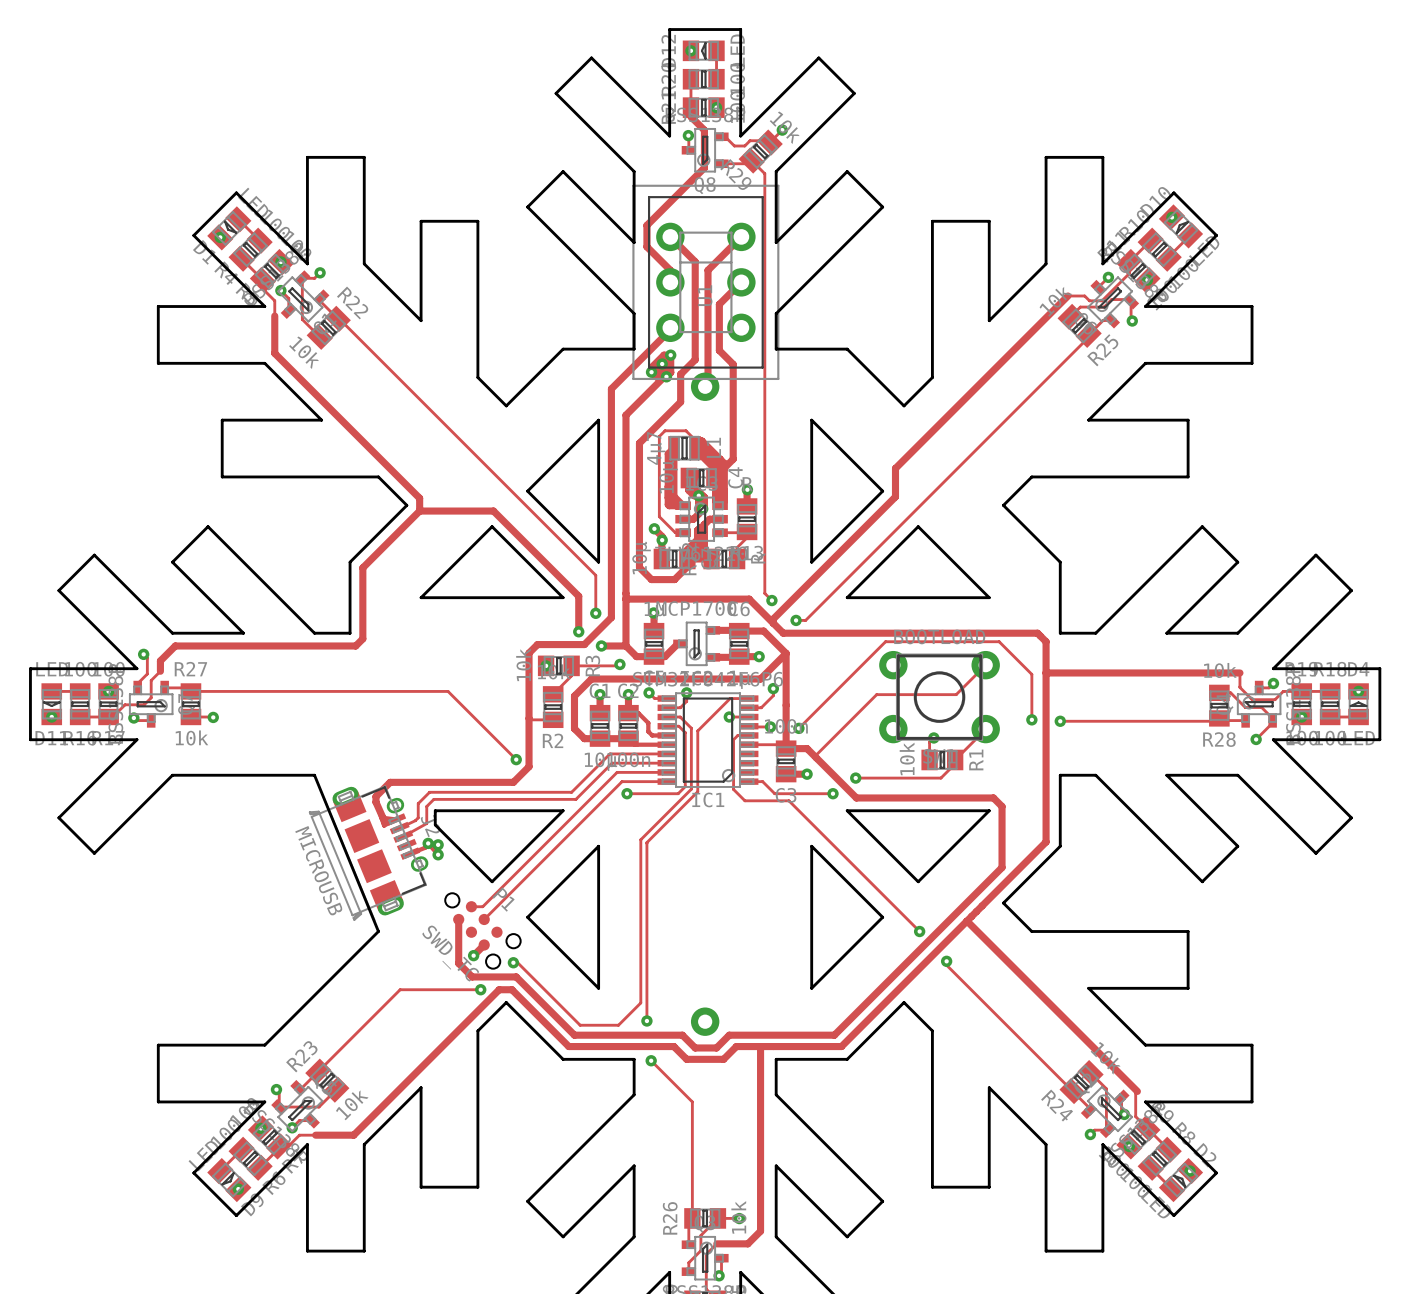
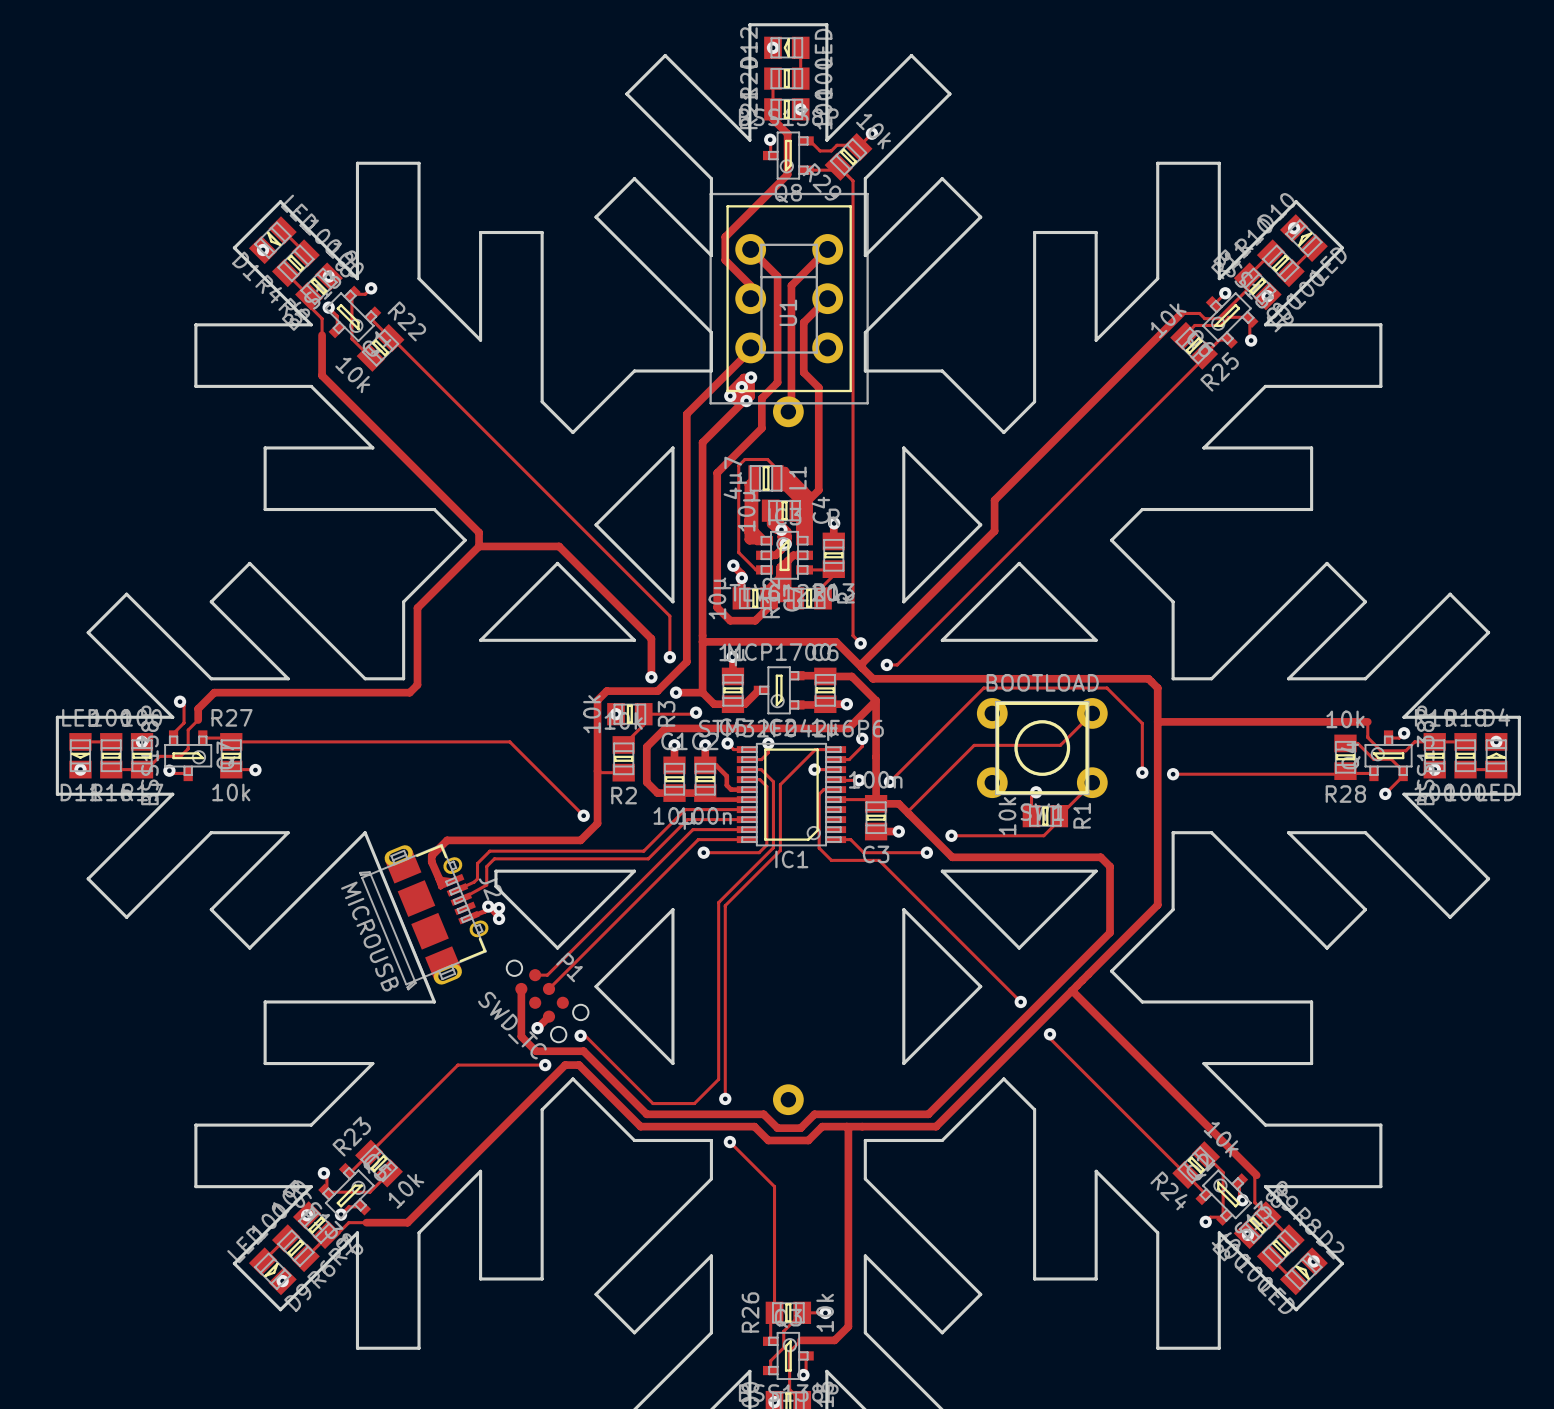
board edge: (243, 775) (314, 775) -> (288, 832) (211, 909) (249, 948) (365, 832)
board edge: (378, 931) (321, 988) -> (434, 1001) (265, 1001) (265, 1063) (372, 1063)

